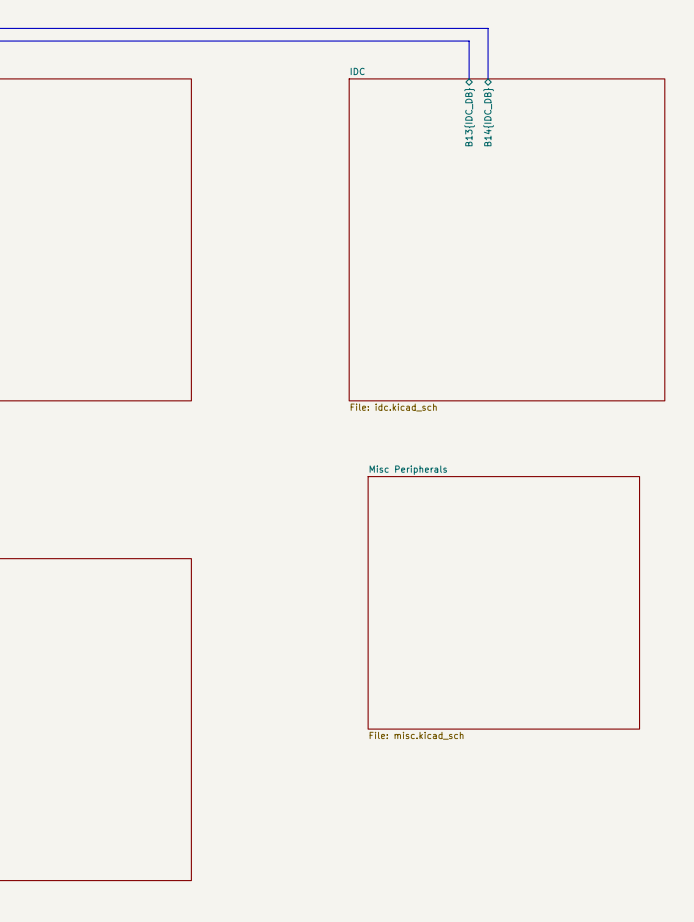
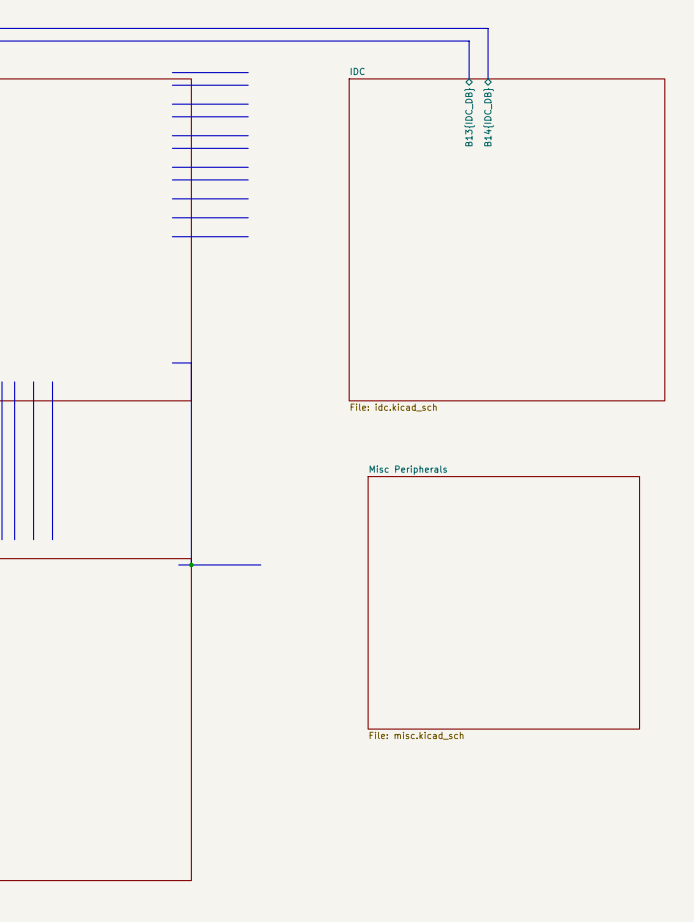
bus: none -> (172, 72) (248, 72)
bus: none -> (172, 85) (248, 85)
bus: none -> (172, 104) (248, 104)
bus: none -> (172, 116) (248, 116)
bus: none -> (172, 135) (248, 135)
bus: none -> (172, 148) (248, 148)
bus: none -> (172, 167) (248, 167)
bus: none -> (172, 179) (248, 179)
bus: none -> (172, 198) (248, 198)
bus: none -> (172, 217) (248, 217)
bus: none -> (172, 236) (248, 236)
bus: none -> (172, 362) (191, 362) (191, 564)
bus: none -> (2, 381) (2, 539)
bus: none -> (14, 381) (14, 539)
bus: none -> (33, 381) (33, 539)
bus: none -> (52, 381) (52, 539)
bus: none -> (178, 564) (260, 564)
junction: none -> (191, 564)

